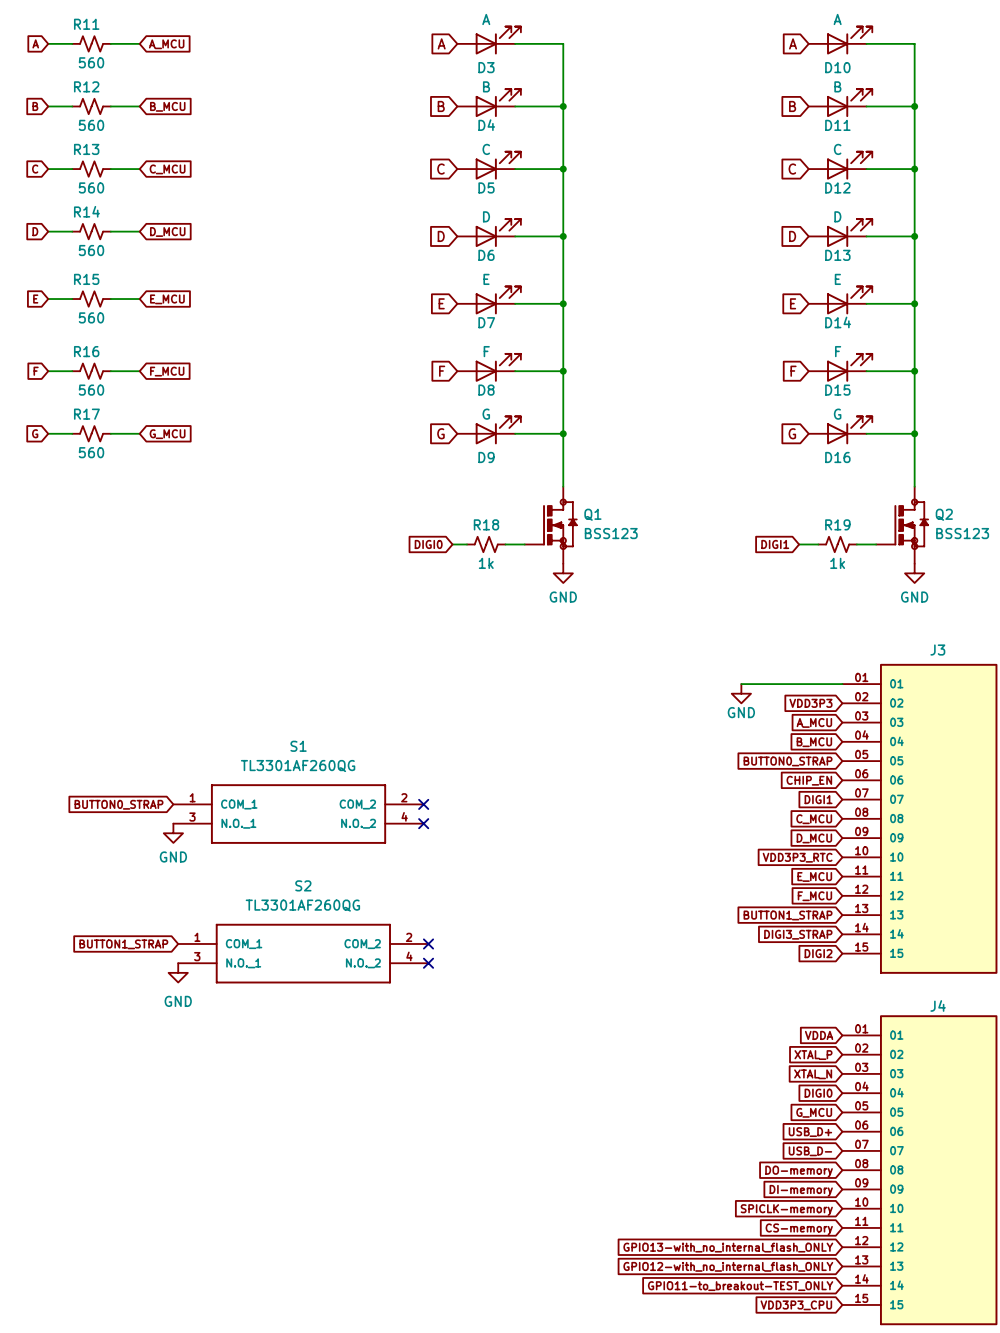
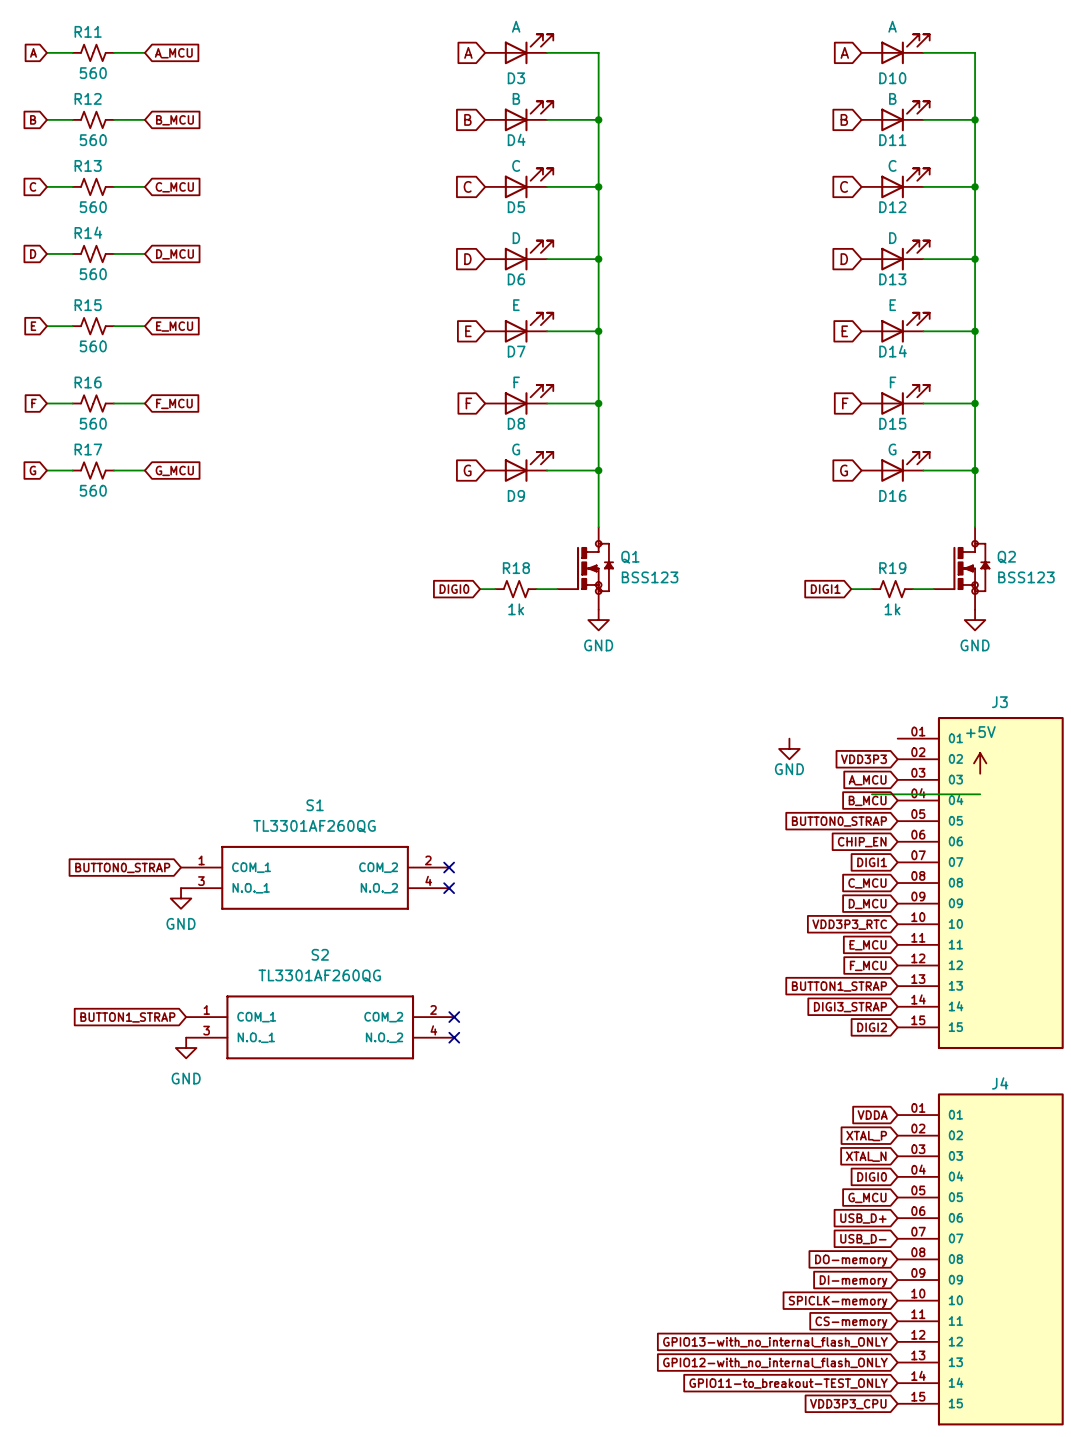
wire: (741, 684) (842, 684) -> (871, 794) (980, 794)
power symbol: none -> +5V (980, 763)

